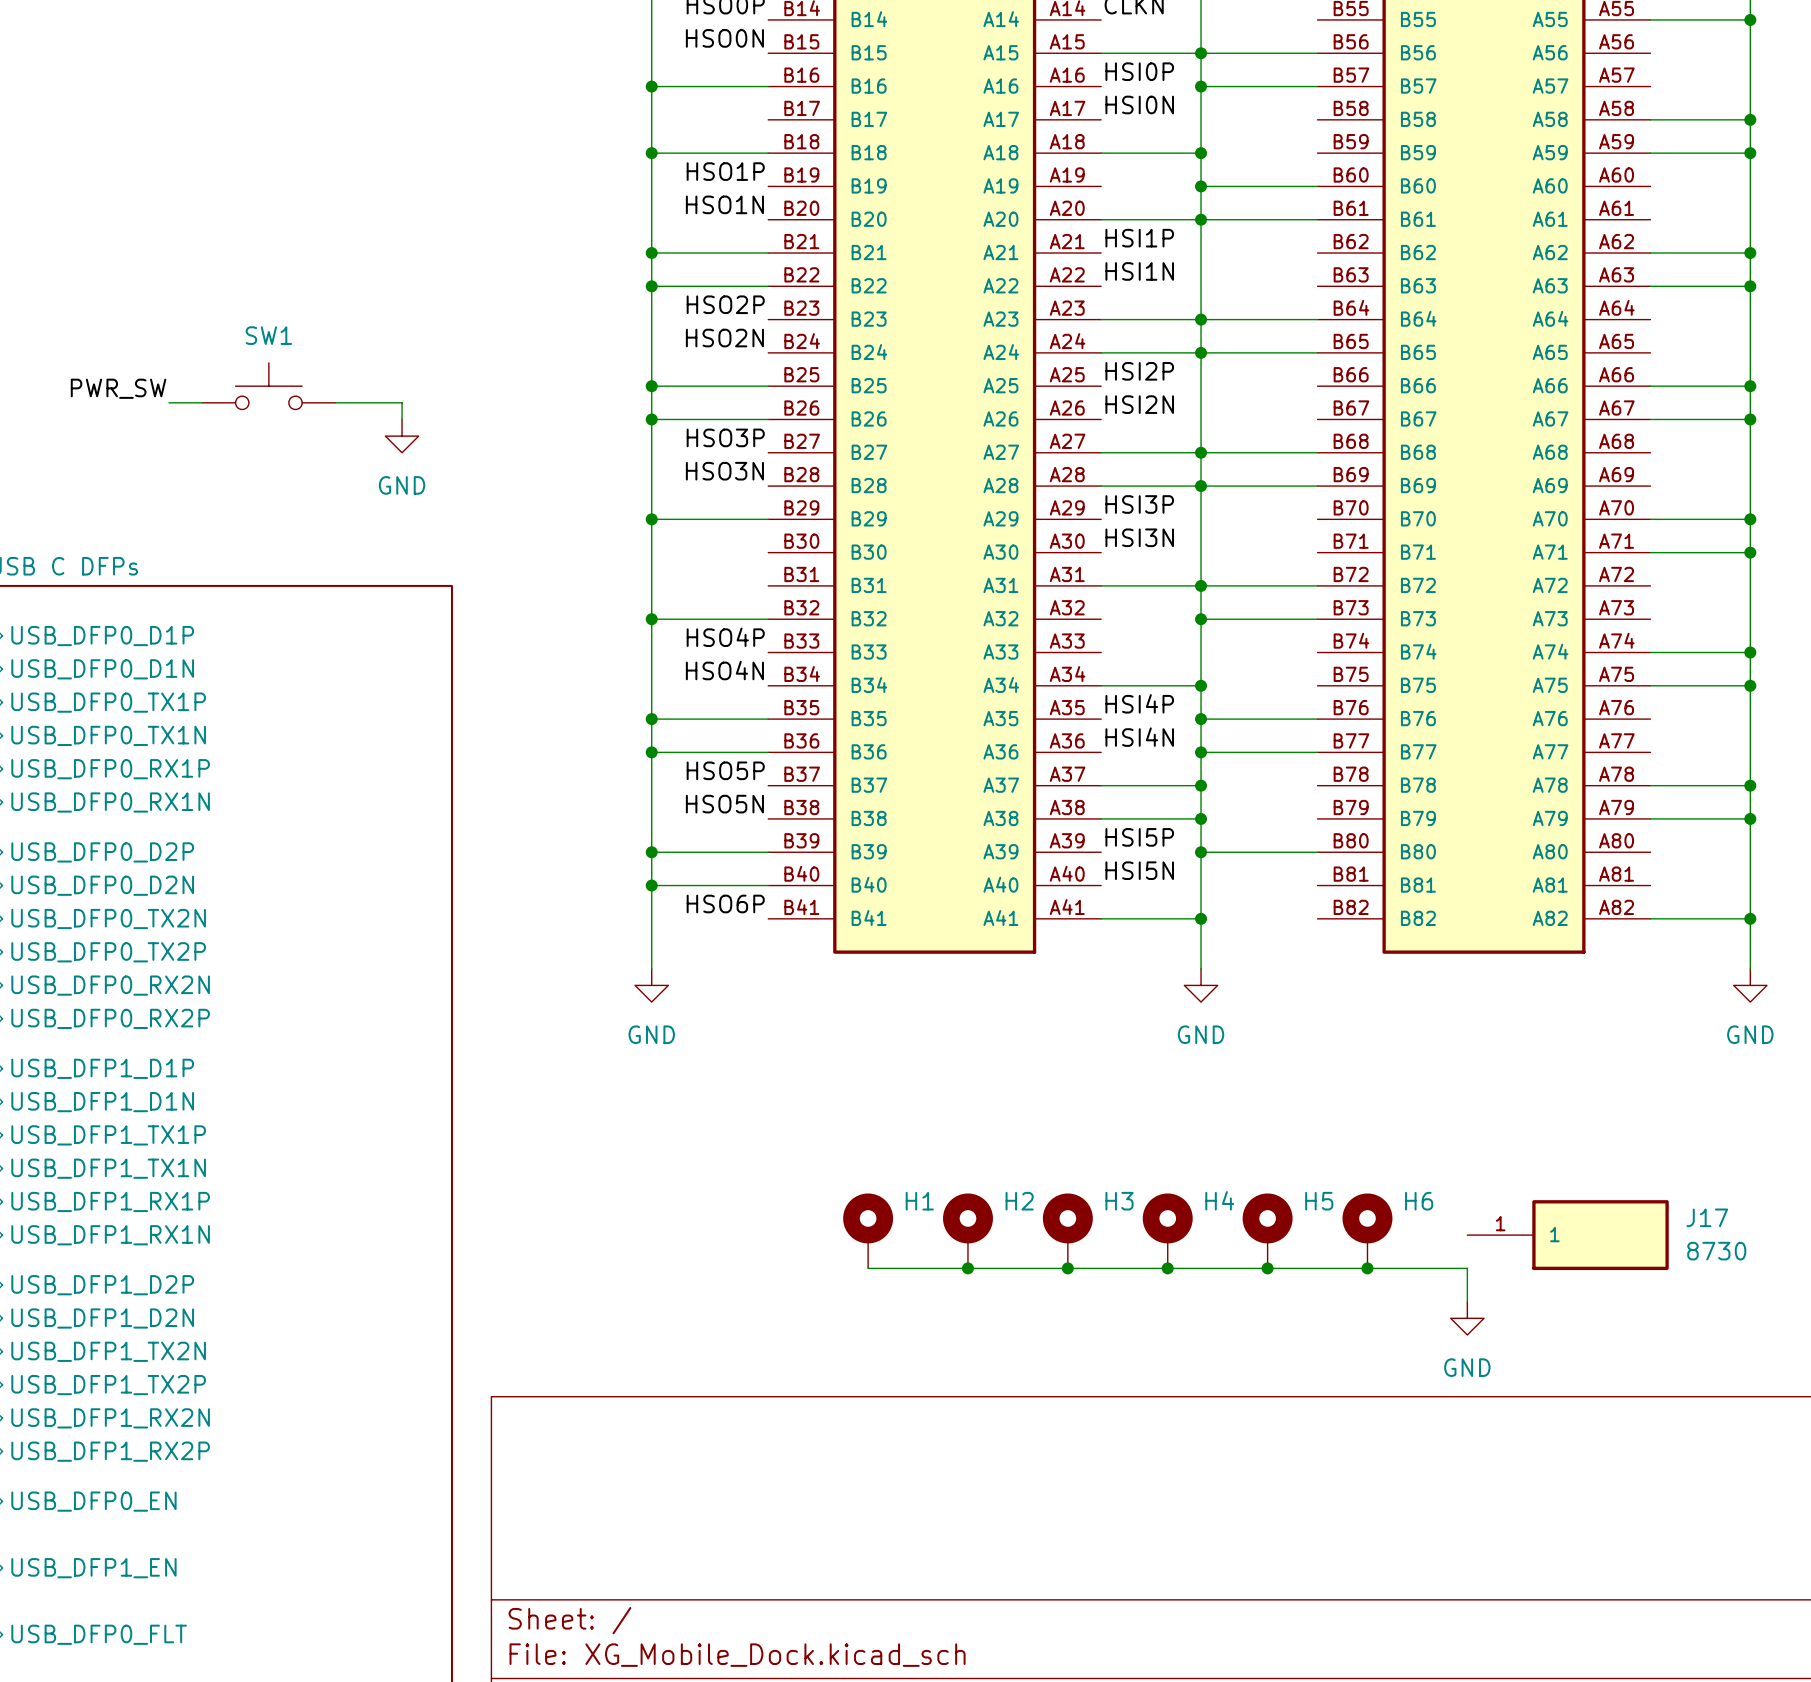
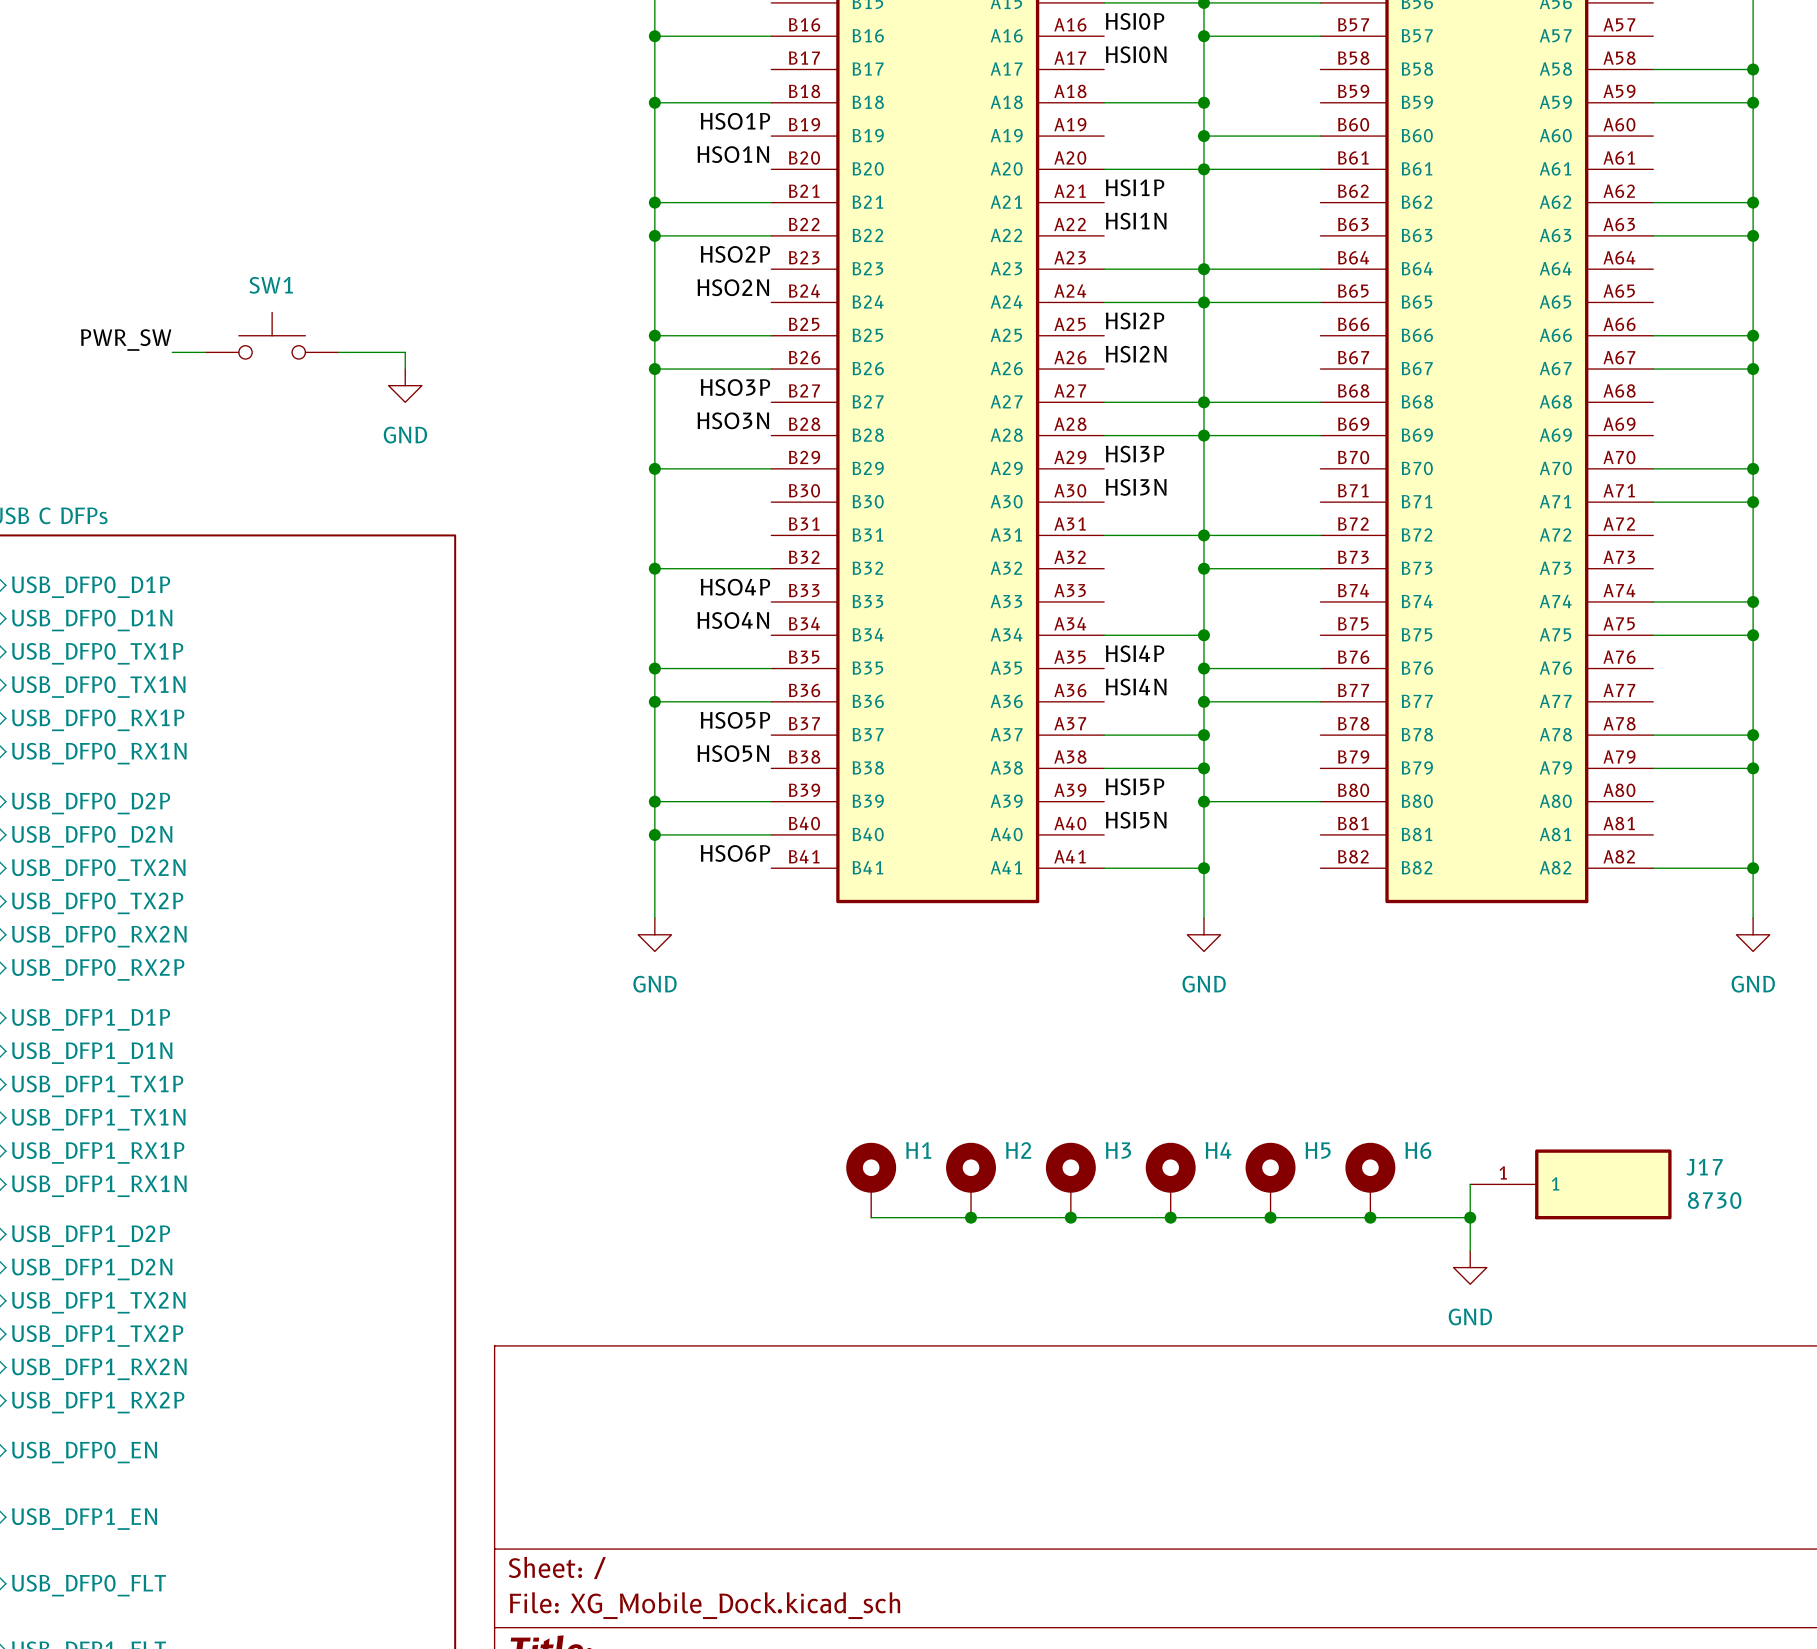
wire: none -> (1470, 1184) (1470, 1217)
junction: none -> (1470, 1217)

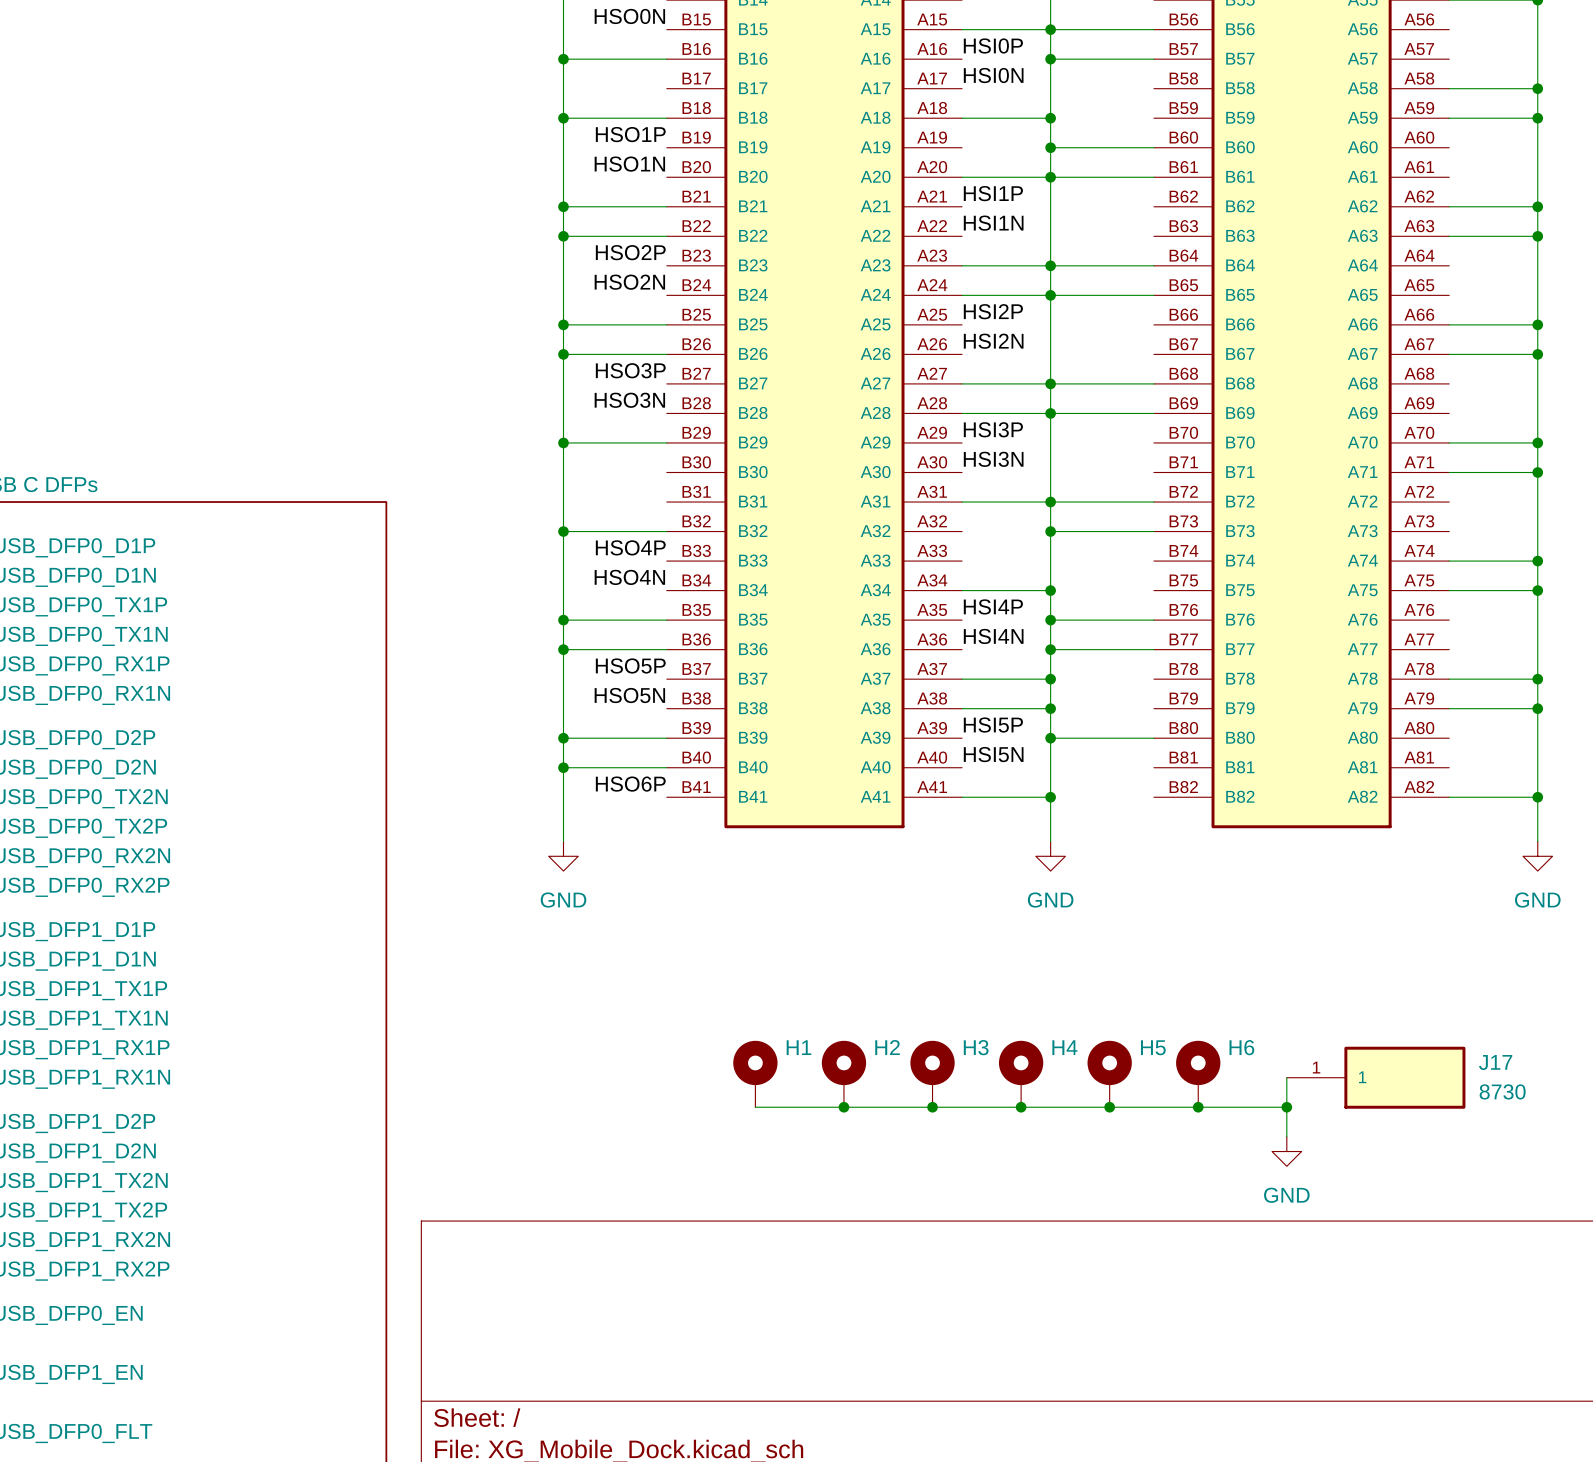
SW1: (272, 335) -> none
label: PWR_SW (126, 340) -> none
wire: (172, 352) (205, 352) -> none
wire: (338, 352) (405, 352) (405, 369) -> none
power symbol: GND (405, 385) -> none

